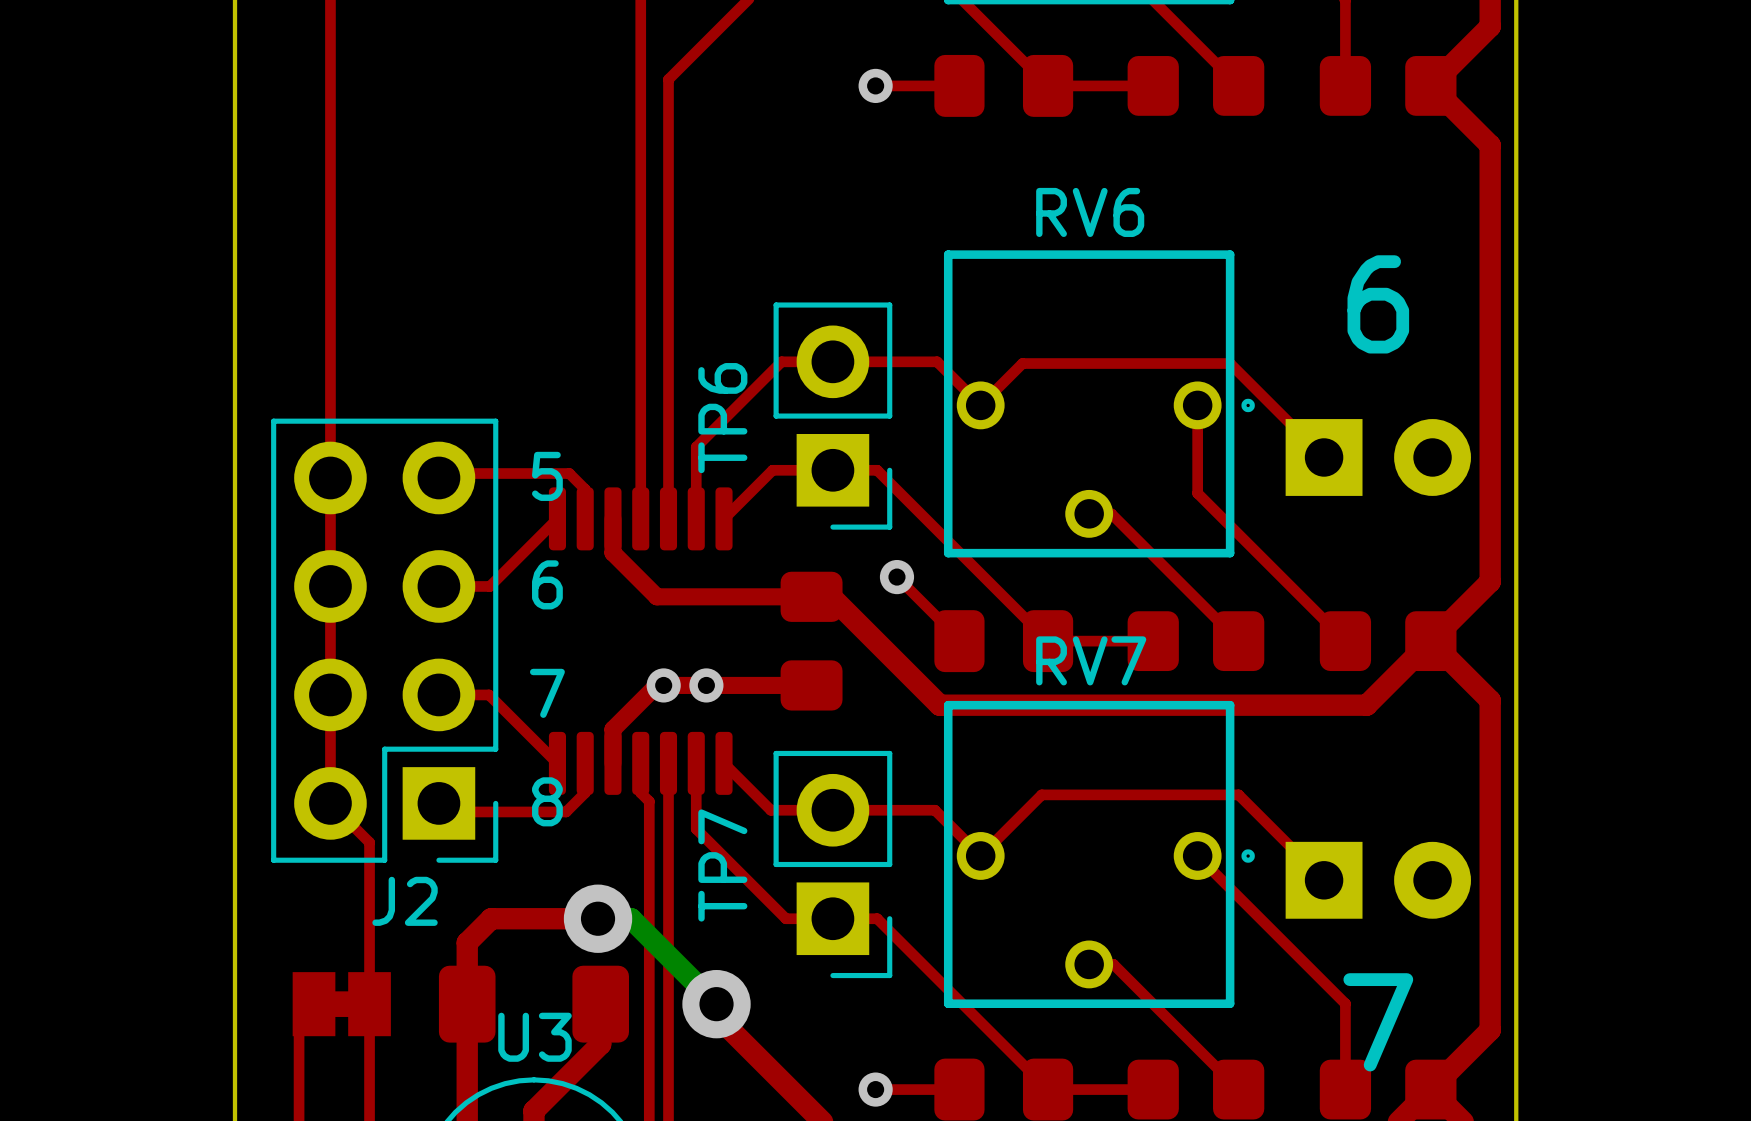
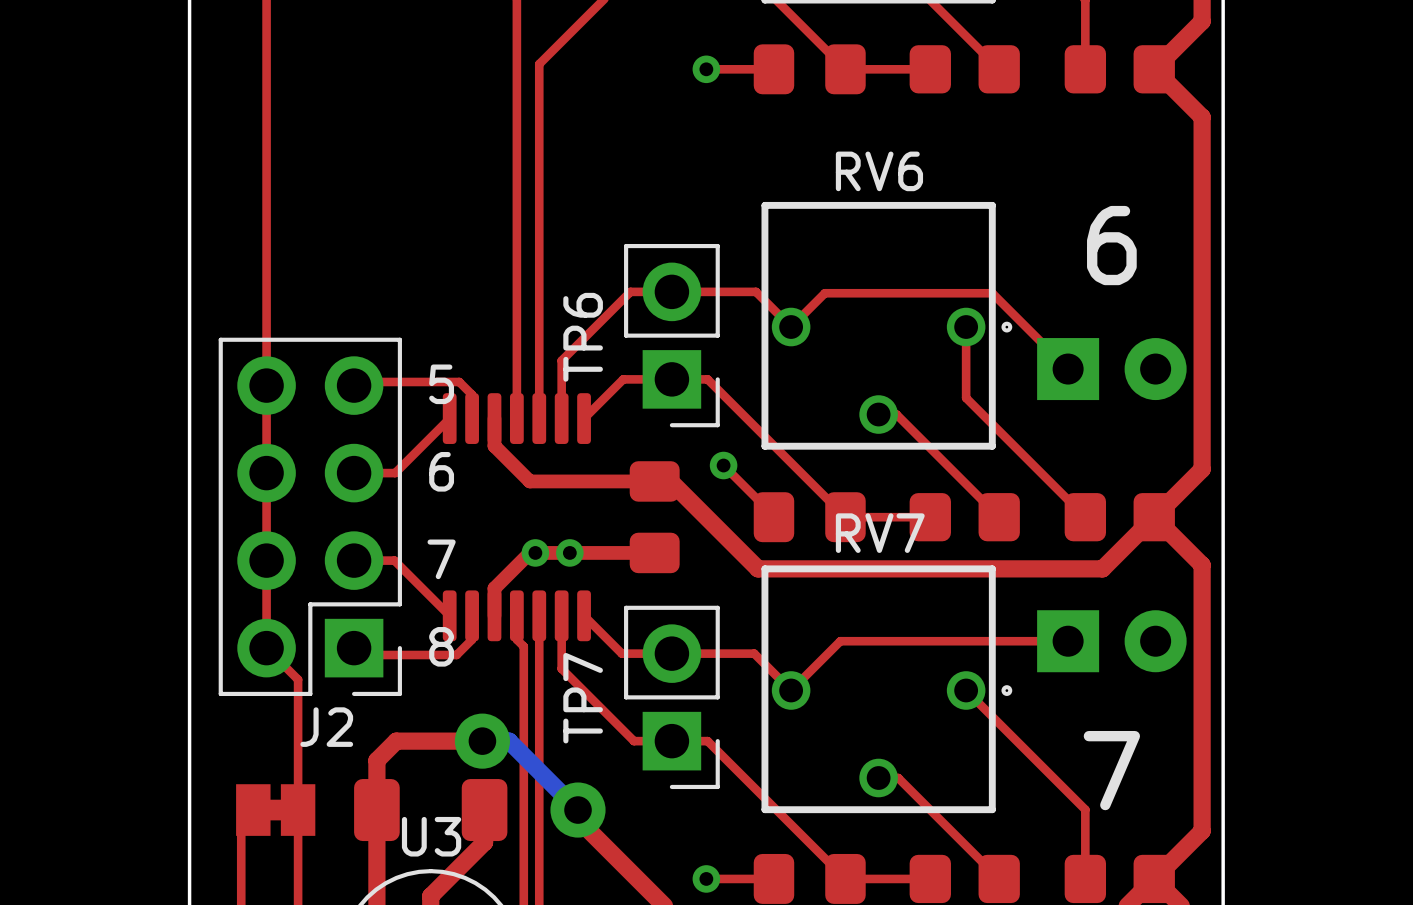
top track: (1238, 794) (1324, 880) -> (999, 641) (1068, 641)
part position: (1378, 880) -> (1111, 641)
text position: 7 (1378, 1022) -> 7 (1111, 770)

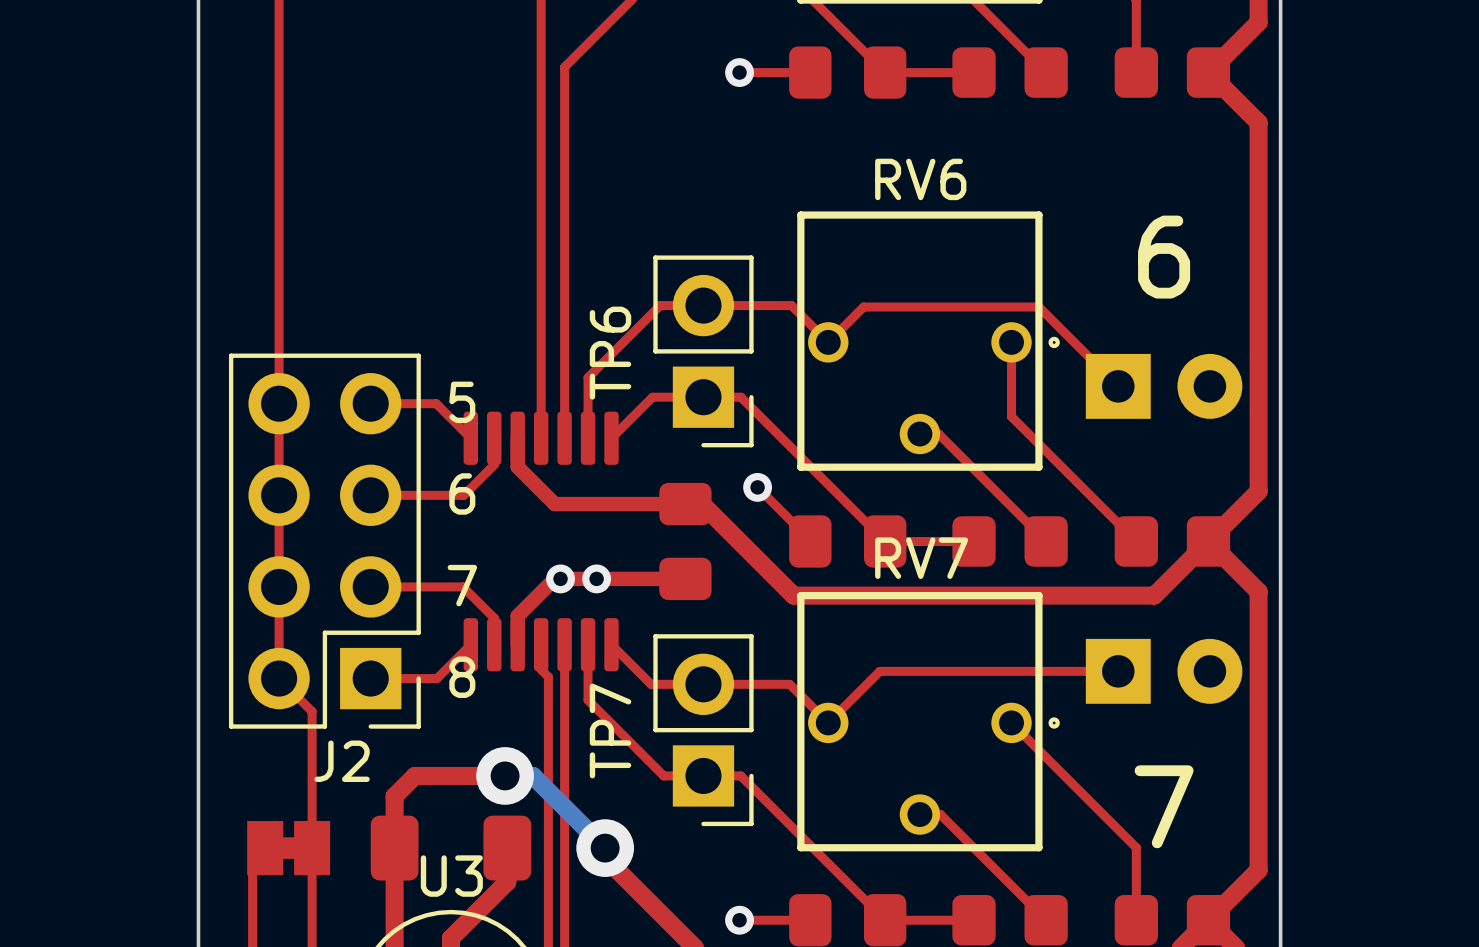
top track: (354, 385) (357, 381) (459, 381) (472, 394) (472, 418) -> (370, 403) (436, 403) (470, 438)
top track: (449, 418) (395, 473) -> (494, 438) (494, 464) (463, 495) (413, 495)
top track: (394, 560) (449, 615) -> (413, 586) (463, 586) (494, 618) (494, 644)
top track: (472, 615) (472, 639) (456, 655) (360, 655) (354, 648) -> (470, 644) (437, 678) (370, 678)

